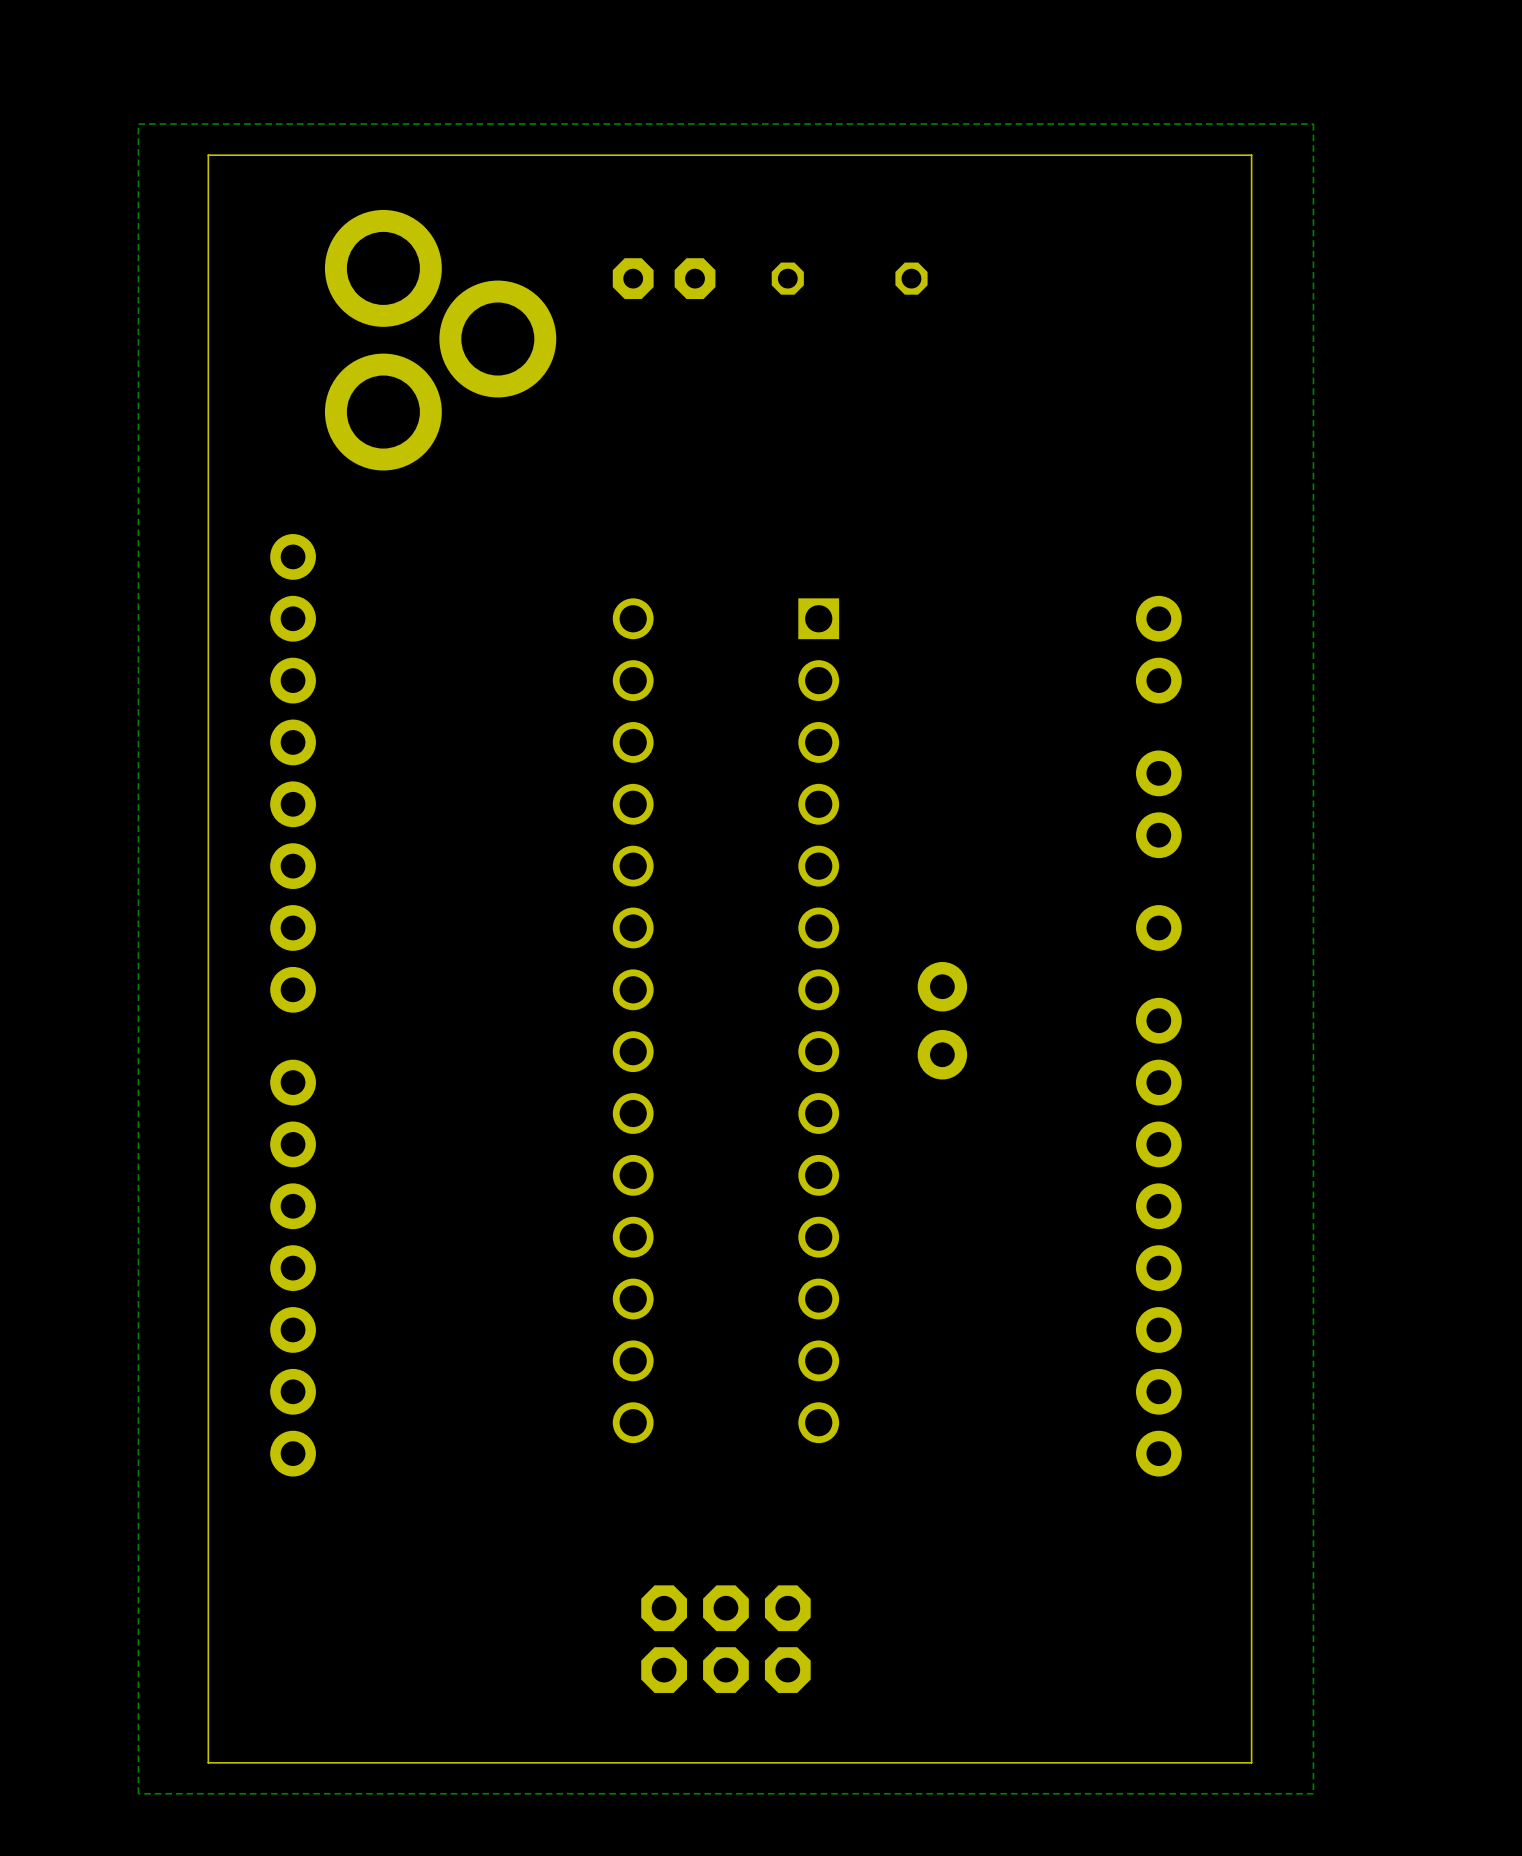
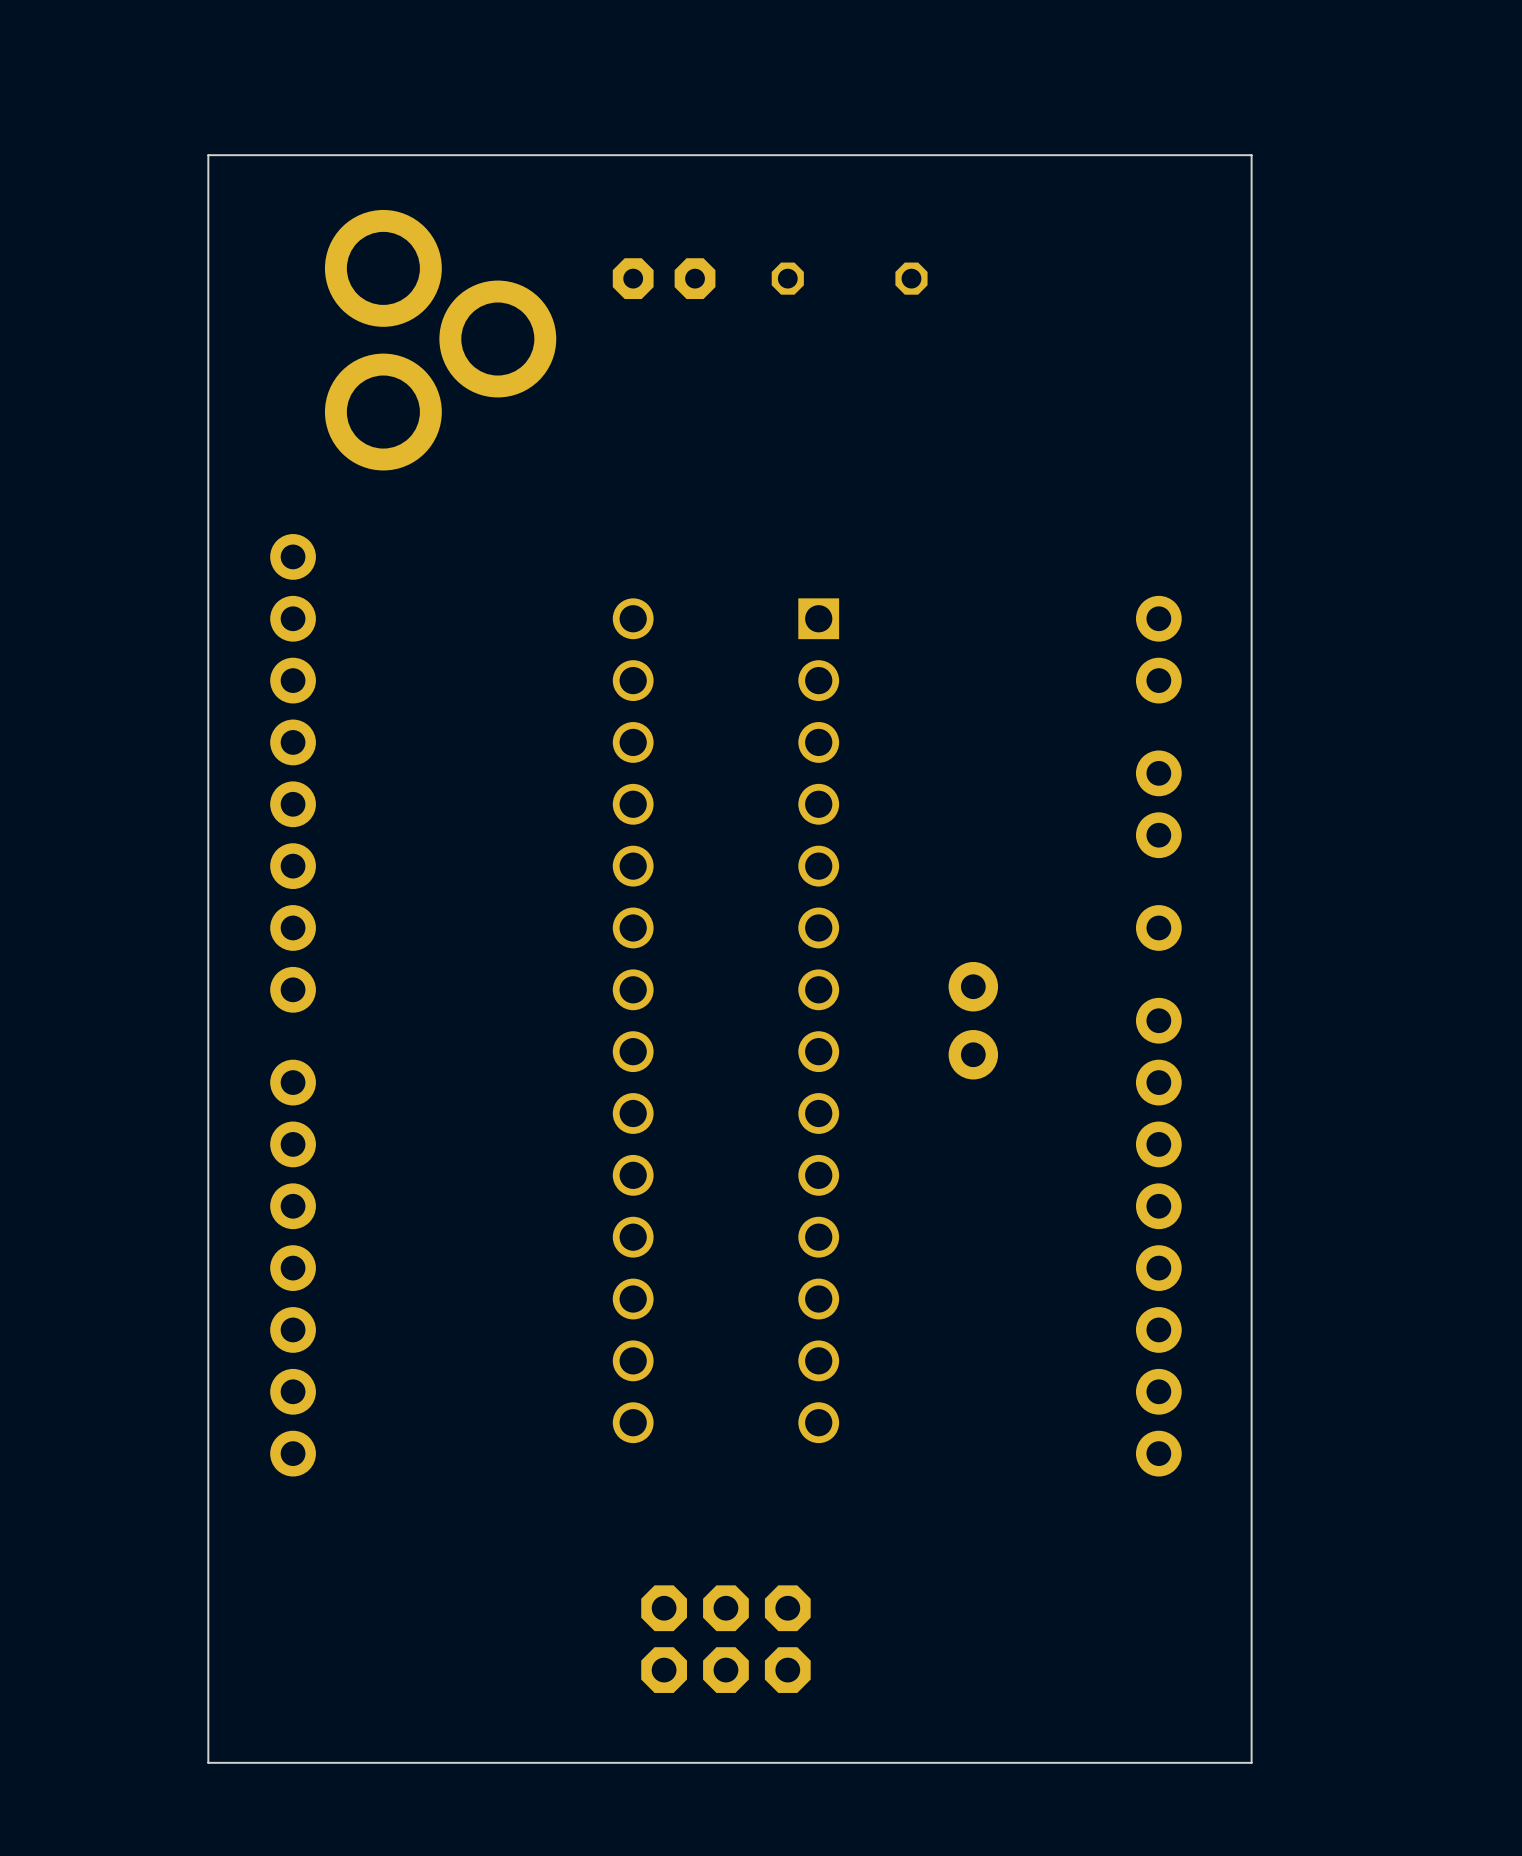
zone outline: (1313, 124) (1313, 1793) (138, 1793) (138, 124) (1313, 124) -> none
part position: (942, 1020) -> (973, 1020)

